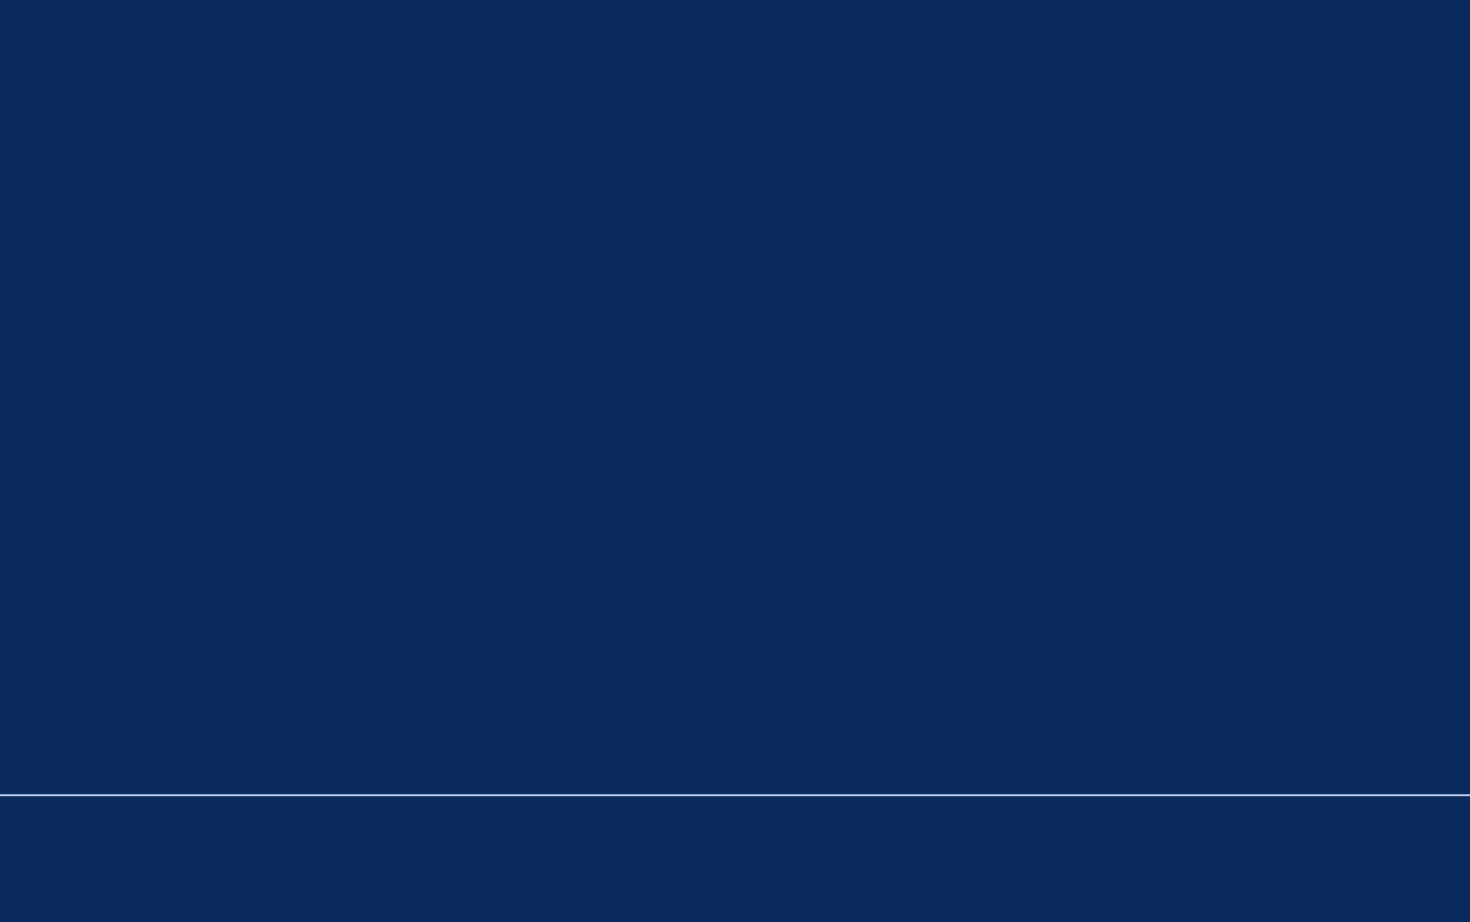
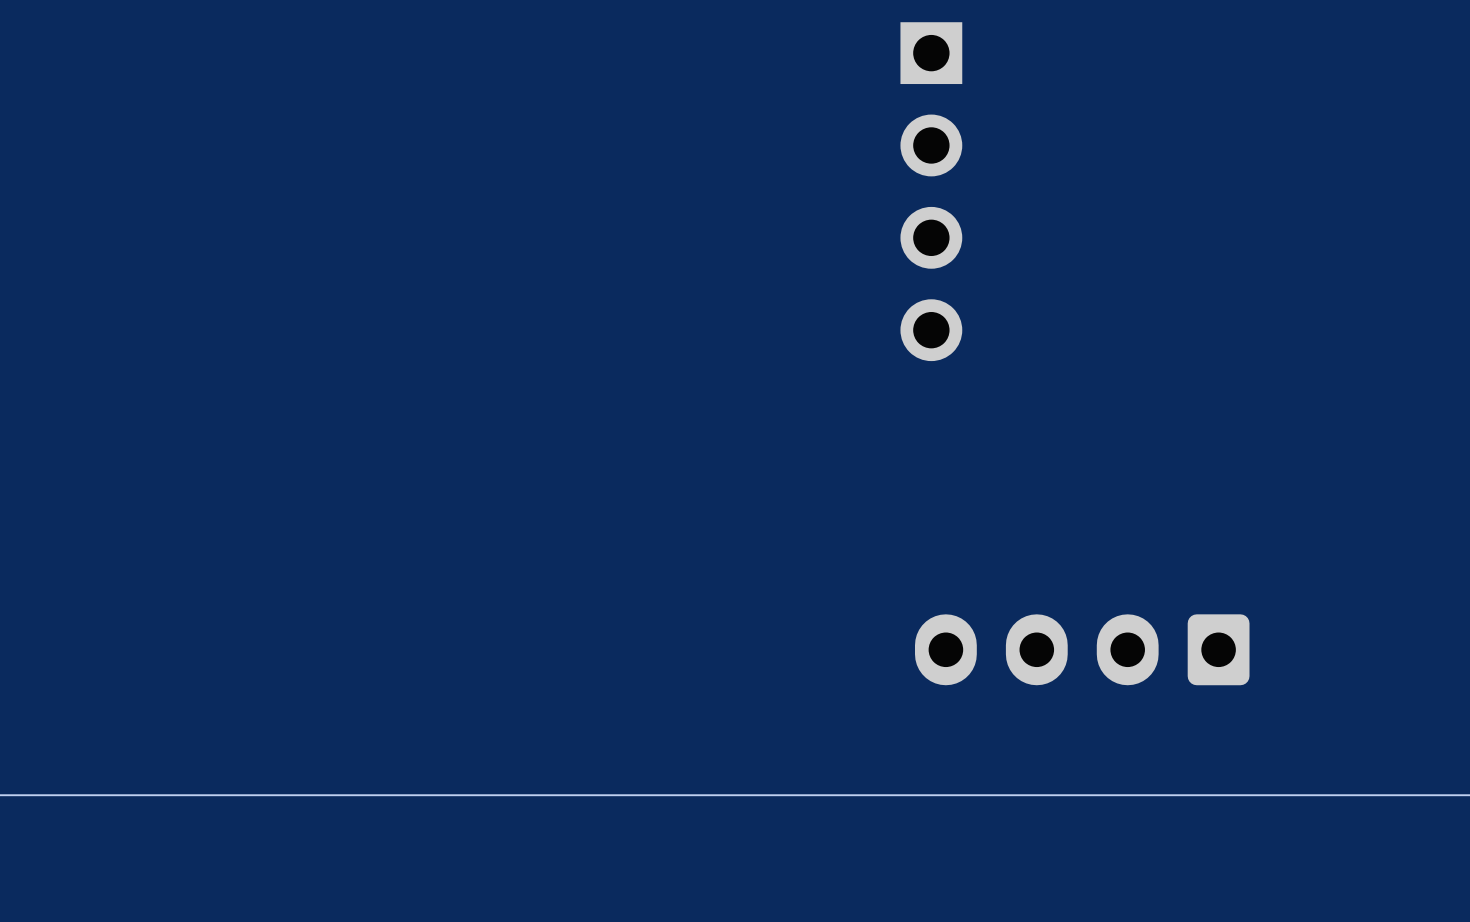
part: none -> (931, 191)
part: none -> (1082, 649)

